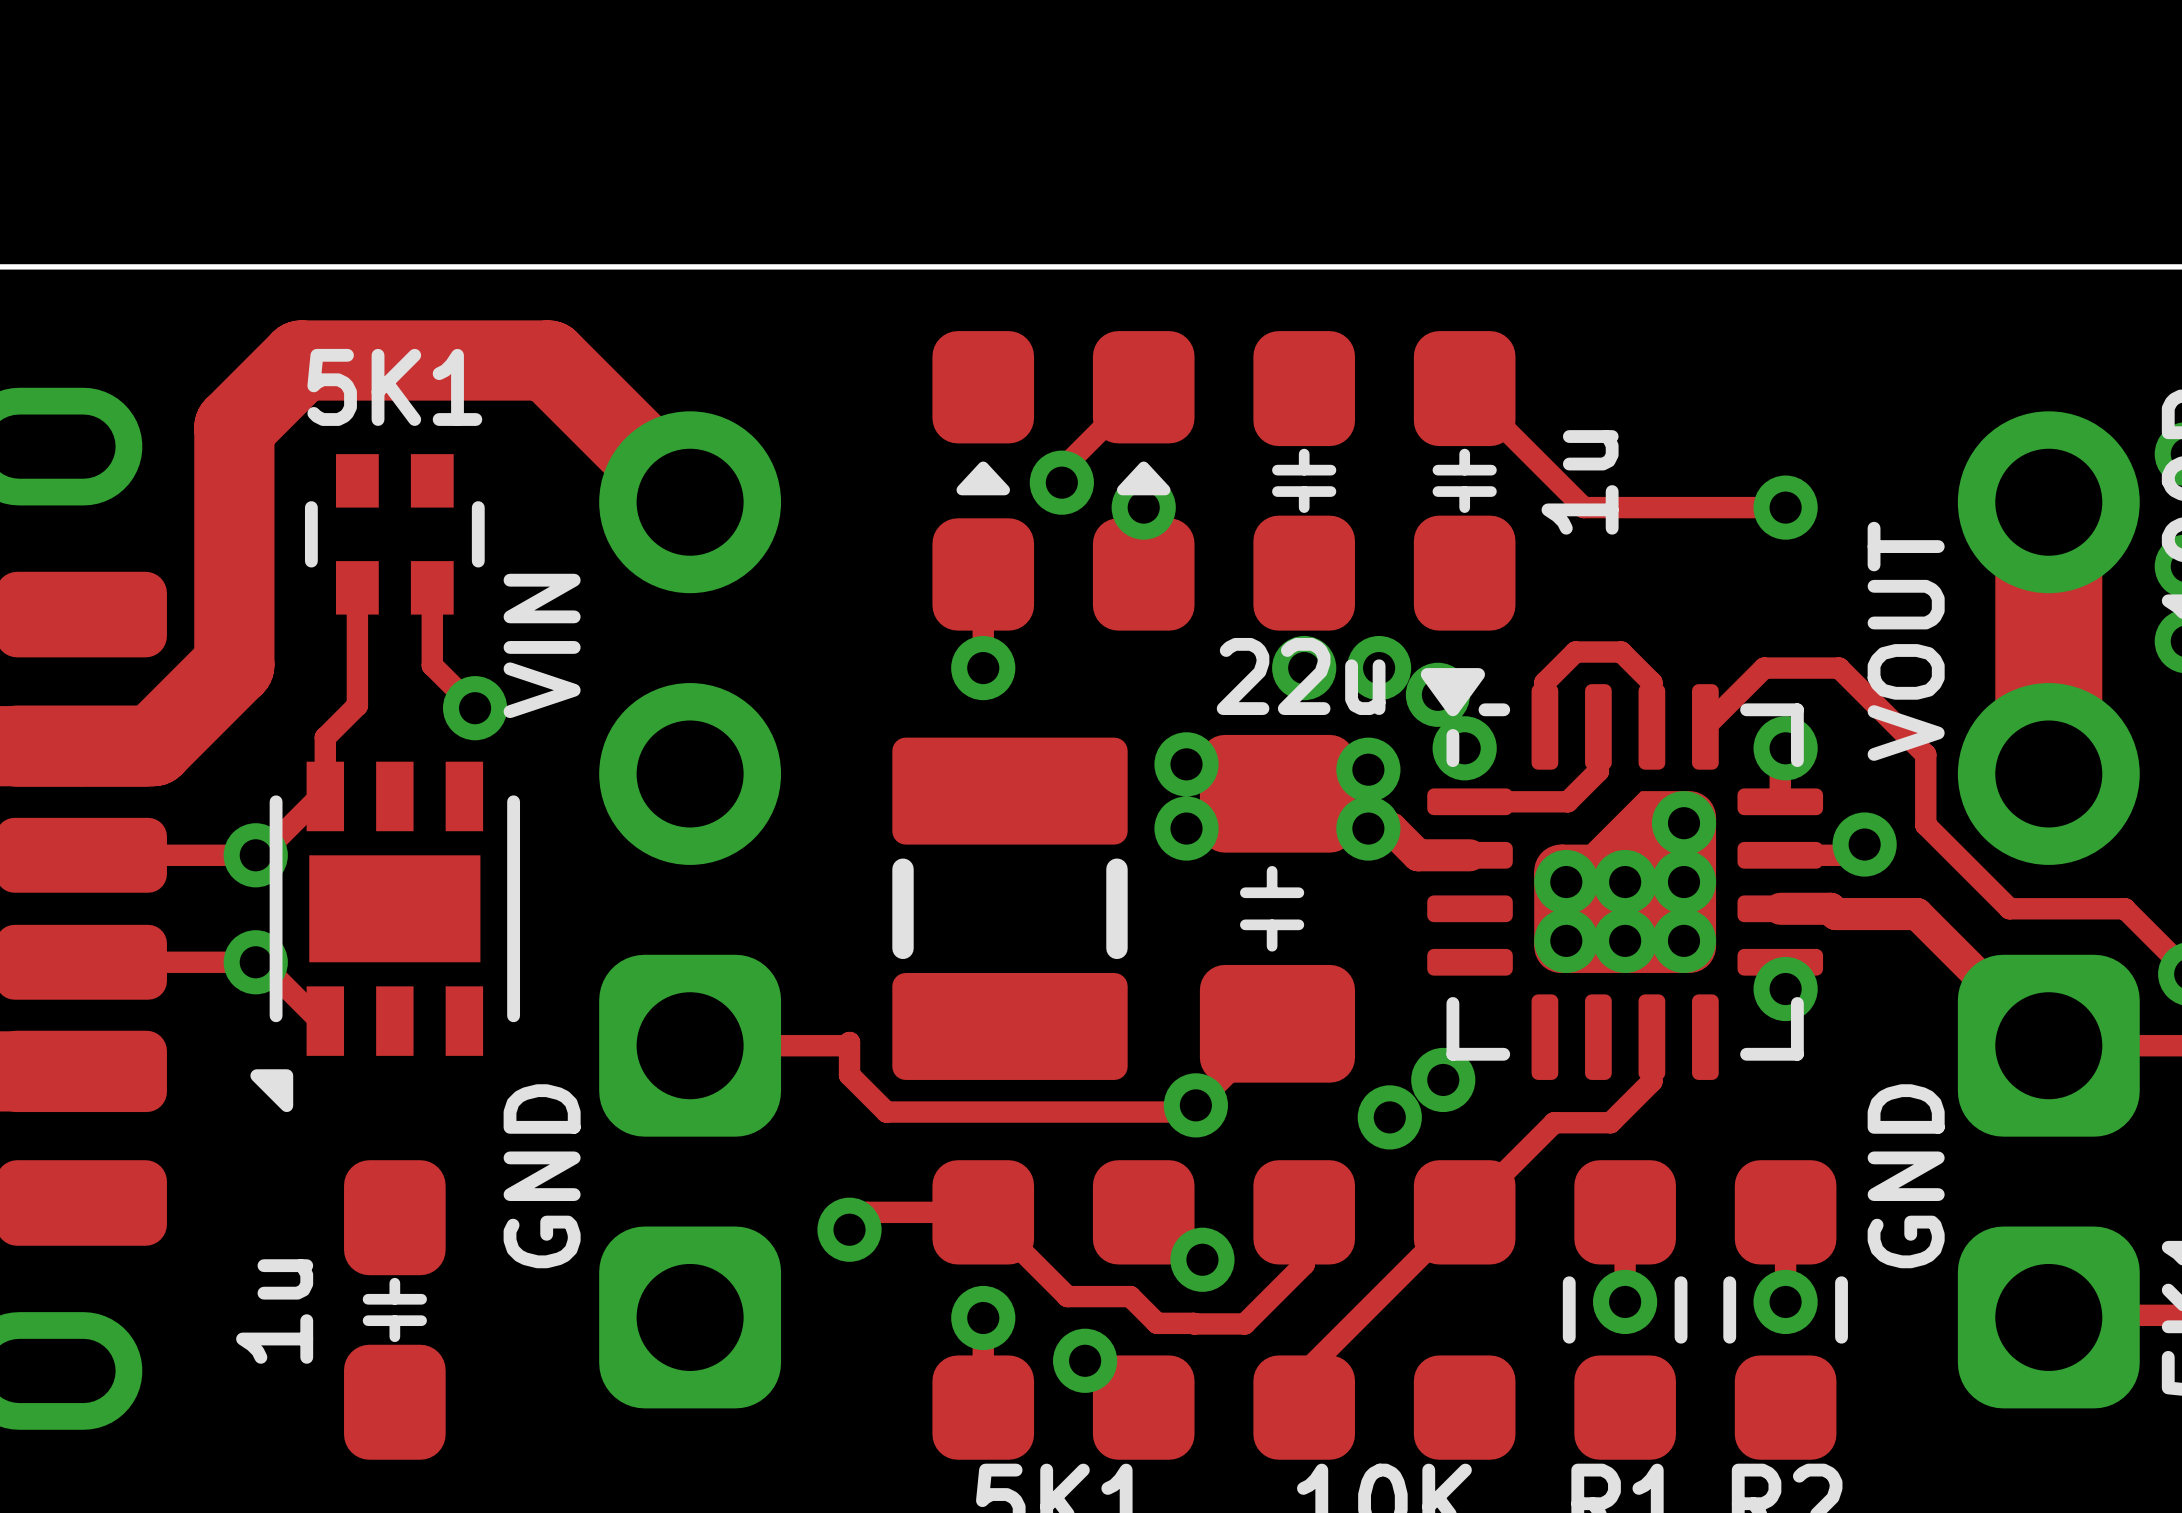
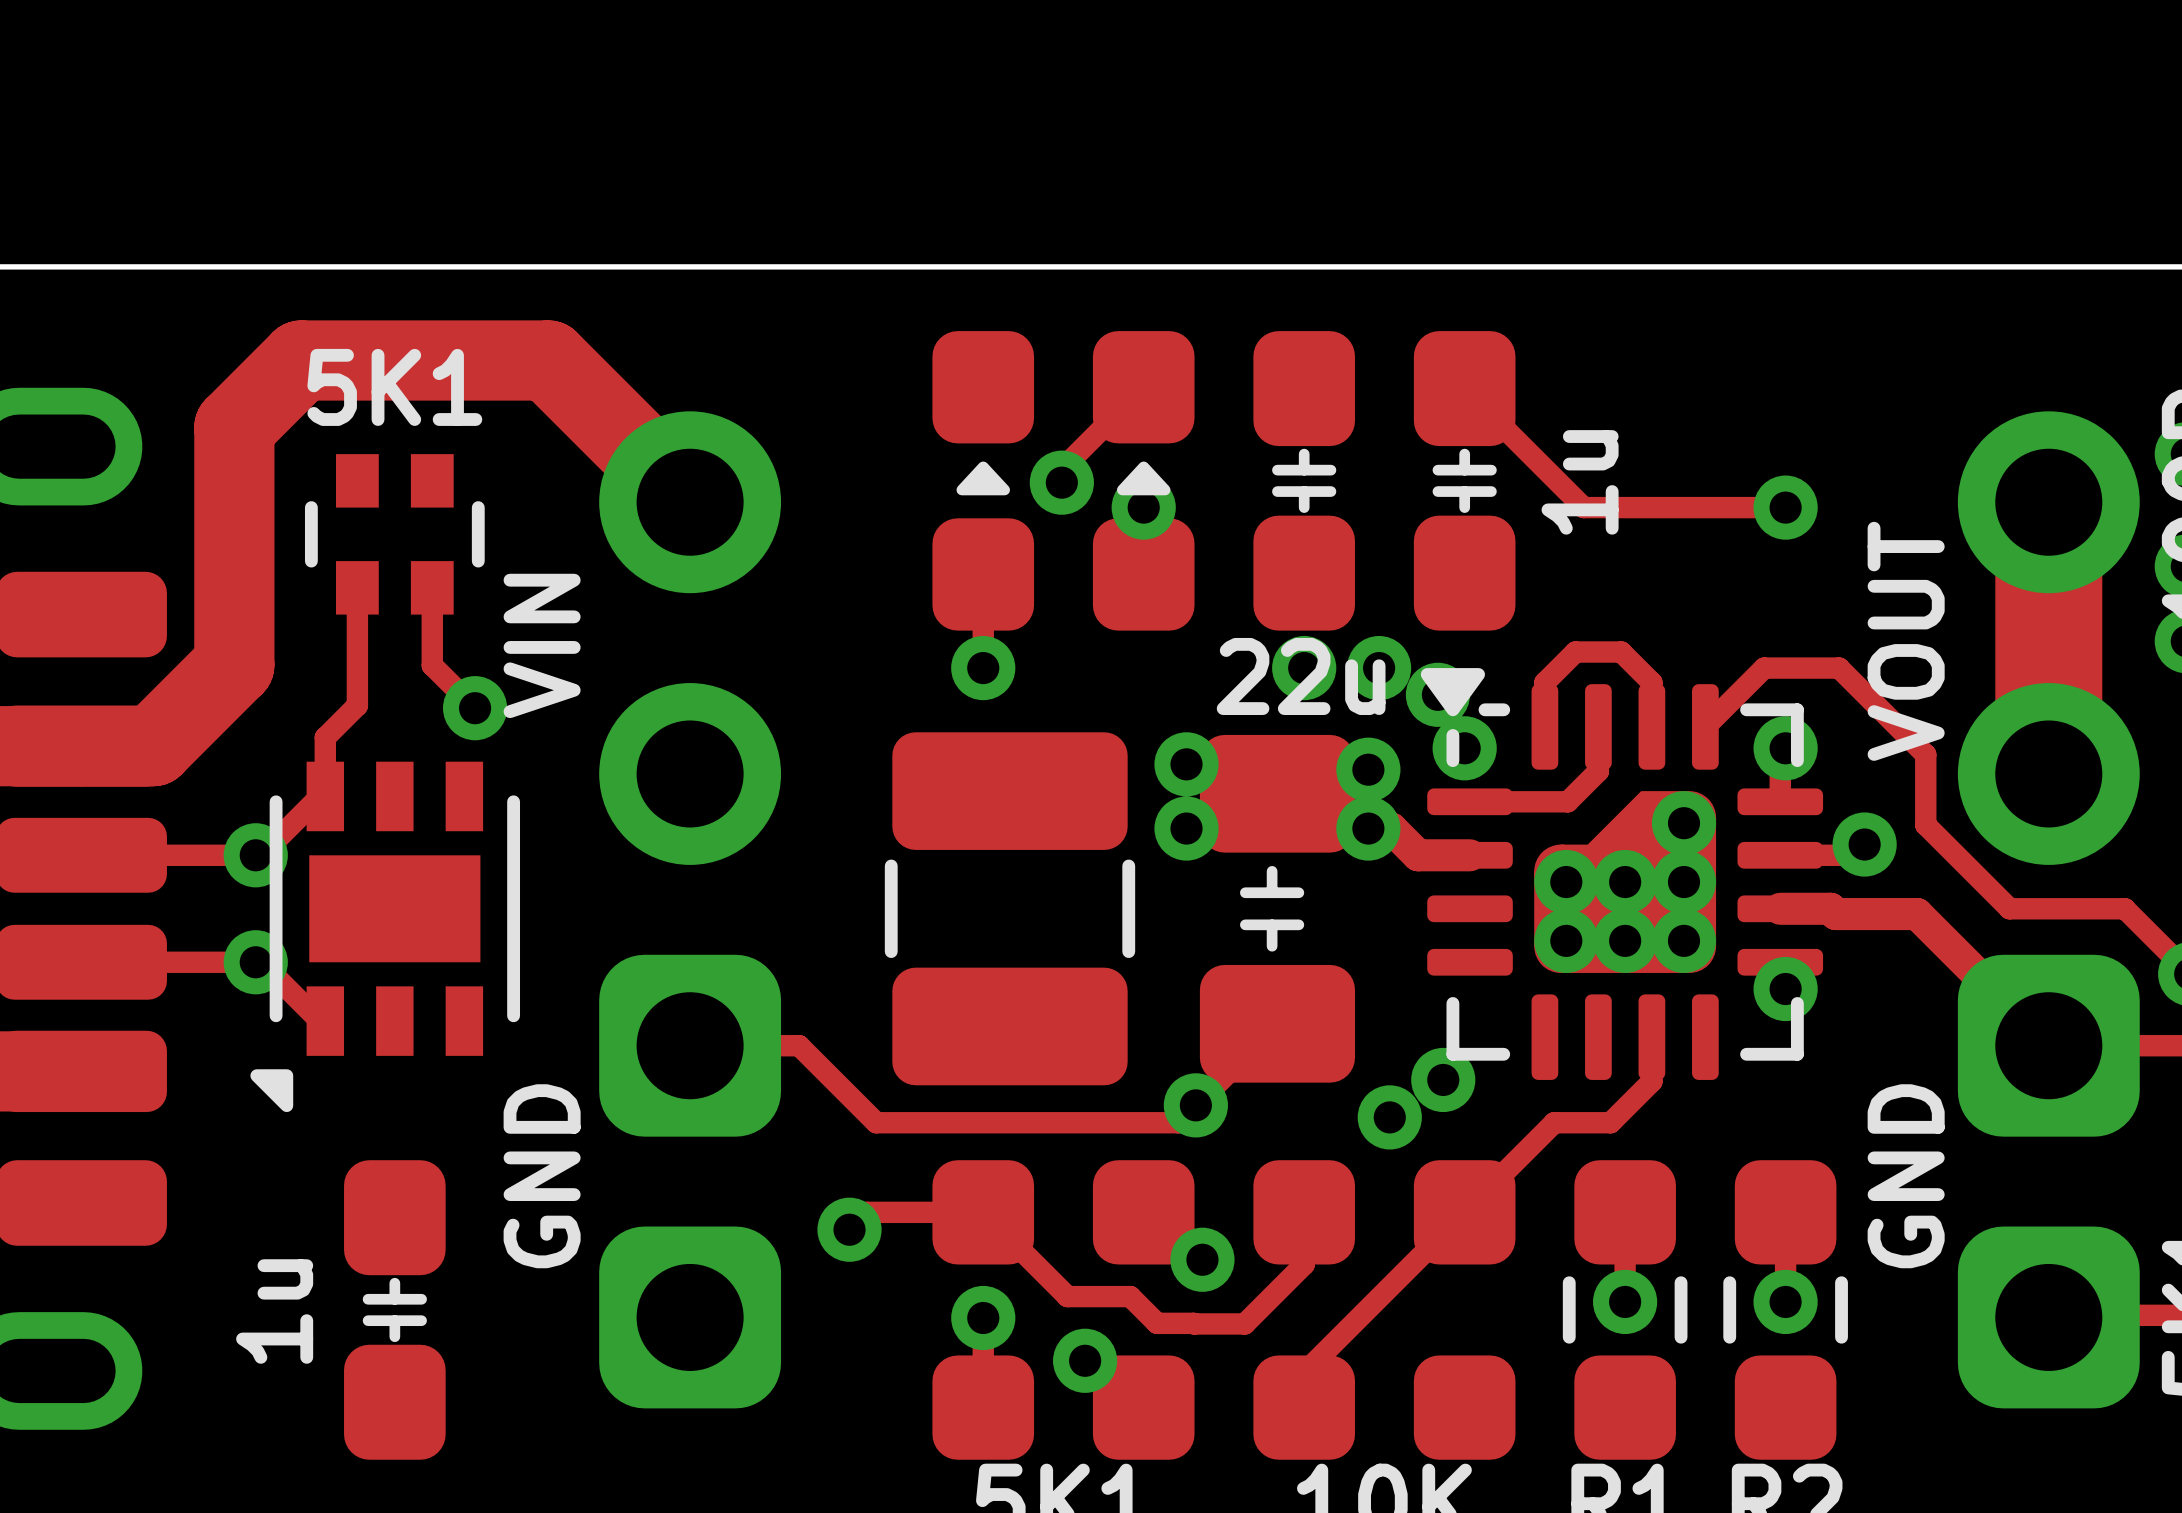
part footprint: [892, 737, 1128, 1080] -> [884, 732, 1136, 1086]
track: (799, 1045) (846, 1045) (849, 1042) (849, 1075) (886, 1112) (1189, 1112) -> (799, 1045) (876, 1122) (1178, 1122) (1189, 1112)

